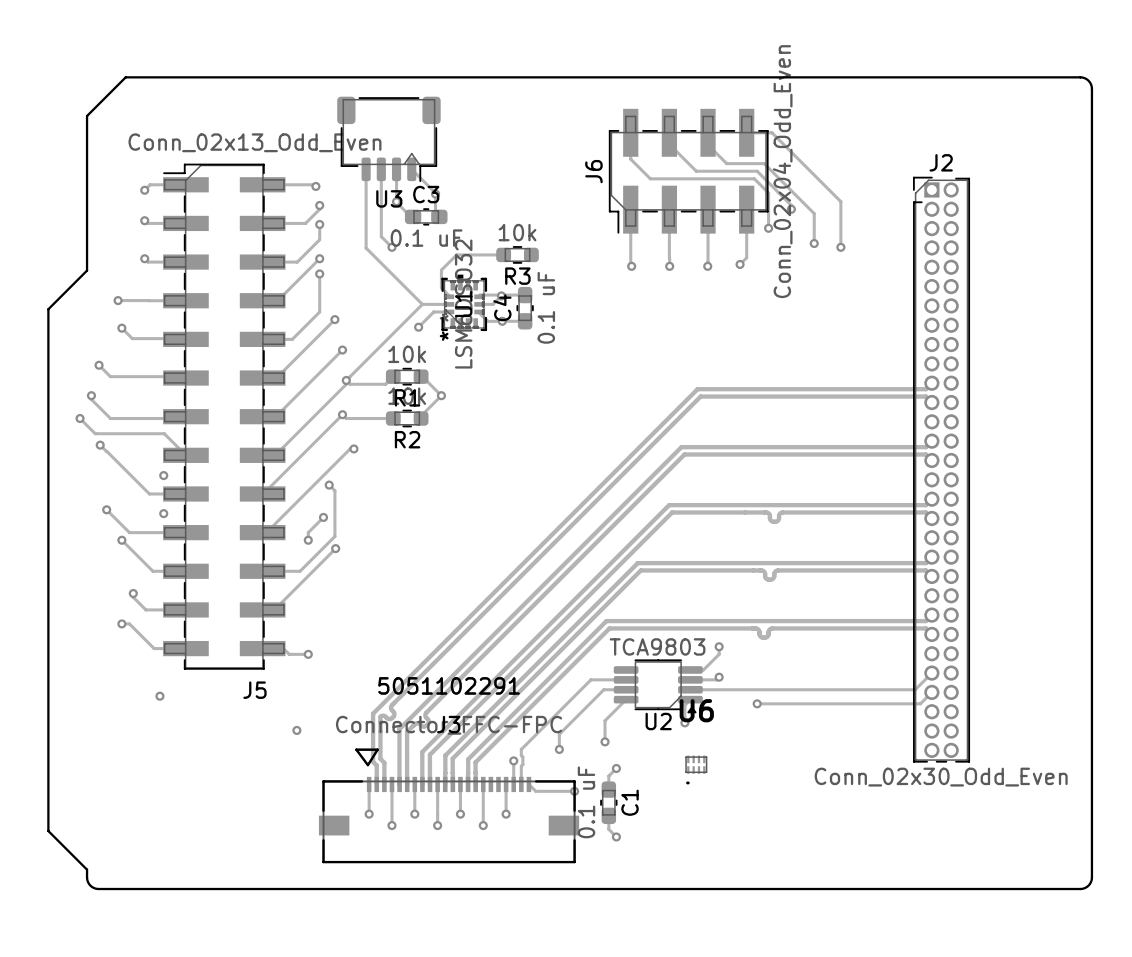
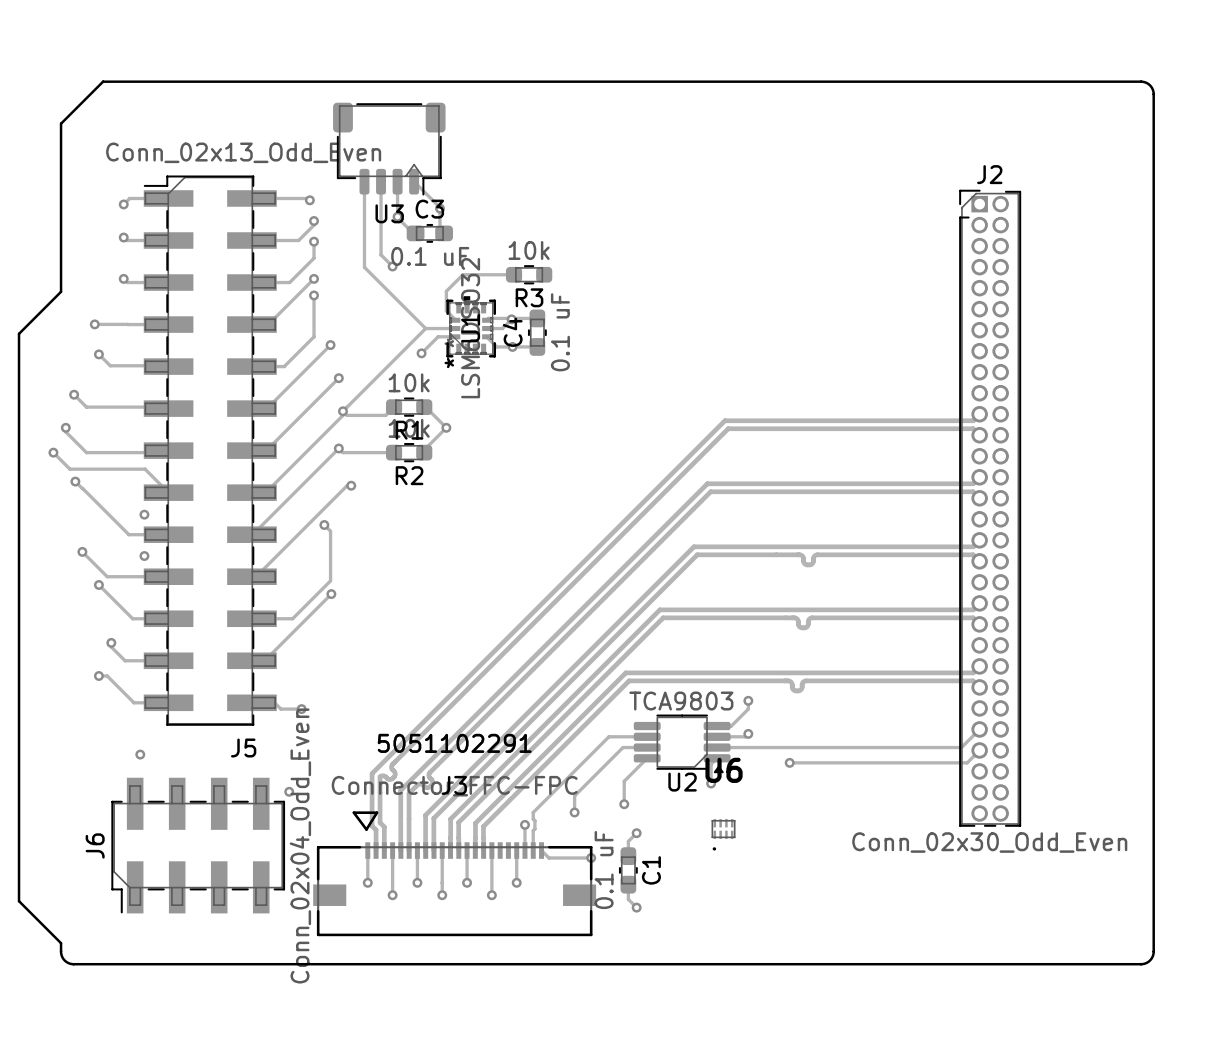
track: (630, 132) (630, 159) (650, 178) (754, 178) (768, 193) (768, 228) -> none
track: (669, 132) (669, 144) (696, 171) (757, 171) (791, 205) (791, 209) -> none
track: (708, 132) (708, 144) (726, 163) (764, 163) (814, 213) (814, 243) -> none
track: (746, 132) (772, 132) (840, 201) (840, 247) -> none
J6 position: (688, 171) -> (198, 845)
track: (630, 209) (631, 266) -> none
track: (669, 209) (669, 266) -> none
track: (708, 209) (707, 266) -> none
track: (746, 209) (746, 257) (740, 264) -> none
via: (791, 209) -> none
via: (768, 228) -> none
via: (814, 243) -> none
via: (840, 247) -> none
via: (740, 264) -> none
via: (631, 266) -> none
via: (669, 266) -> none
via: (707, 266) -> none
track: (323, 517) (308, 532) (308, 540) -> none
via: (323, 517) -> none
via: (308, 540) -> none

